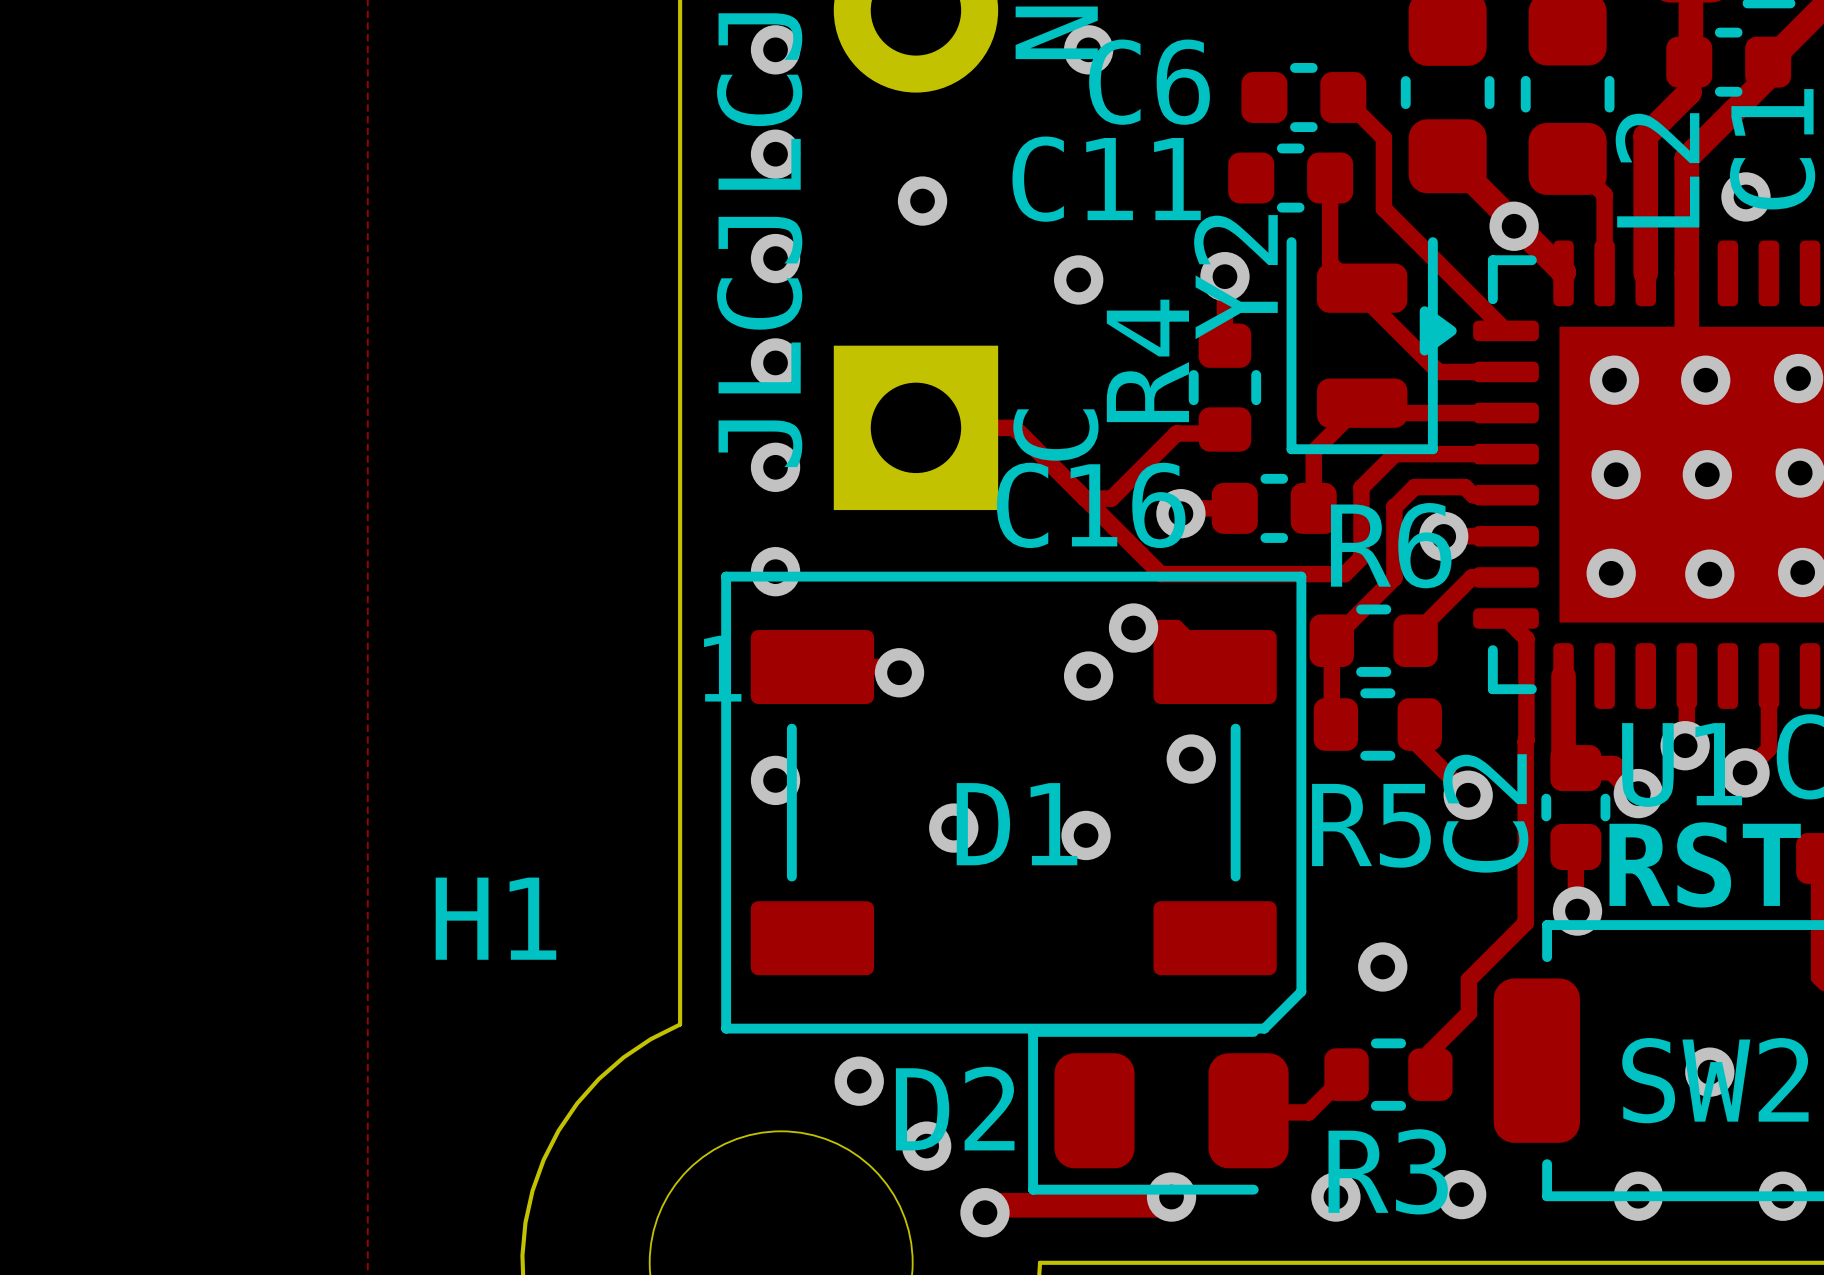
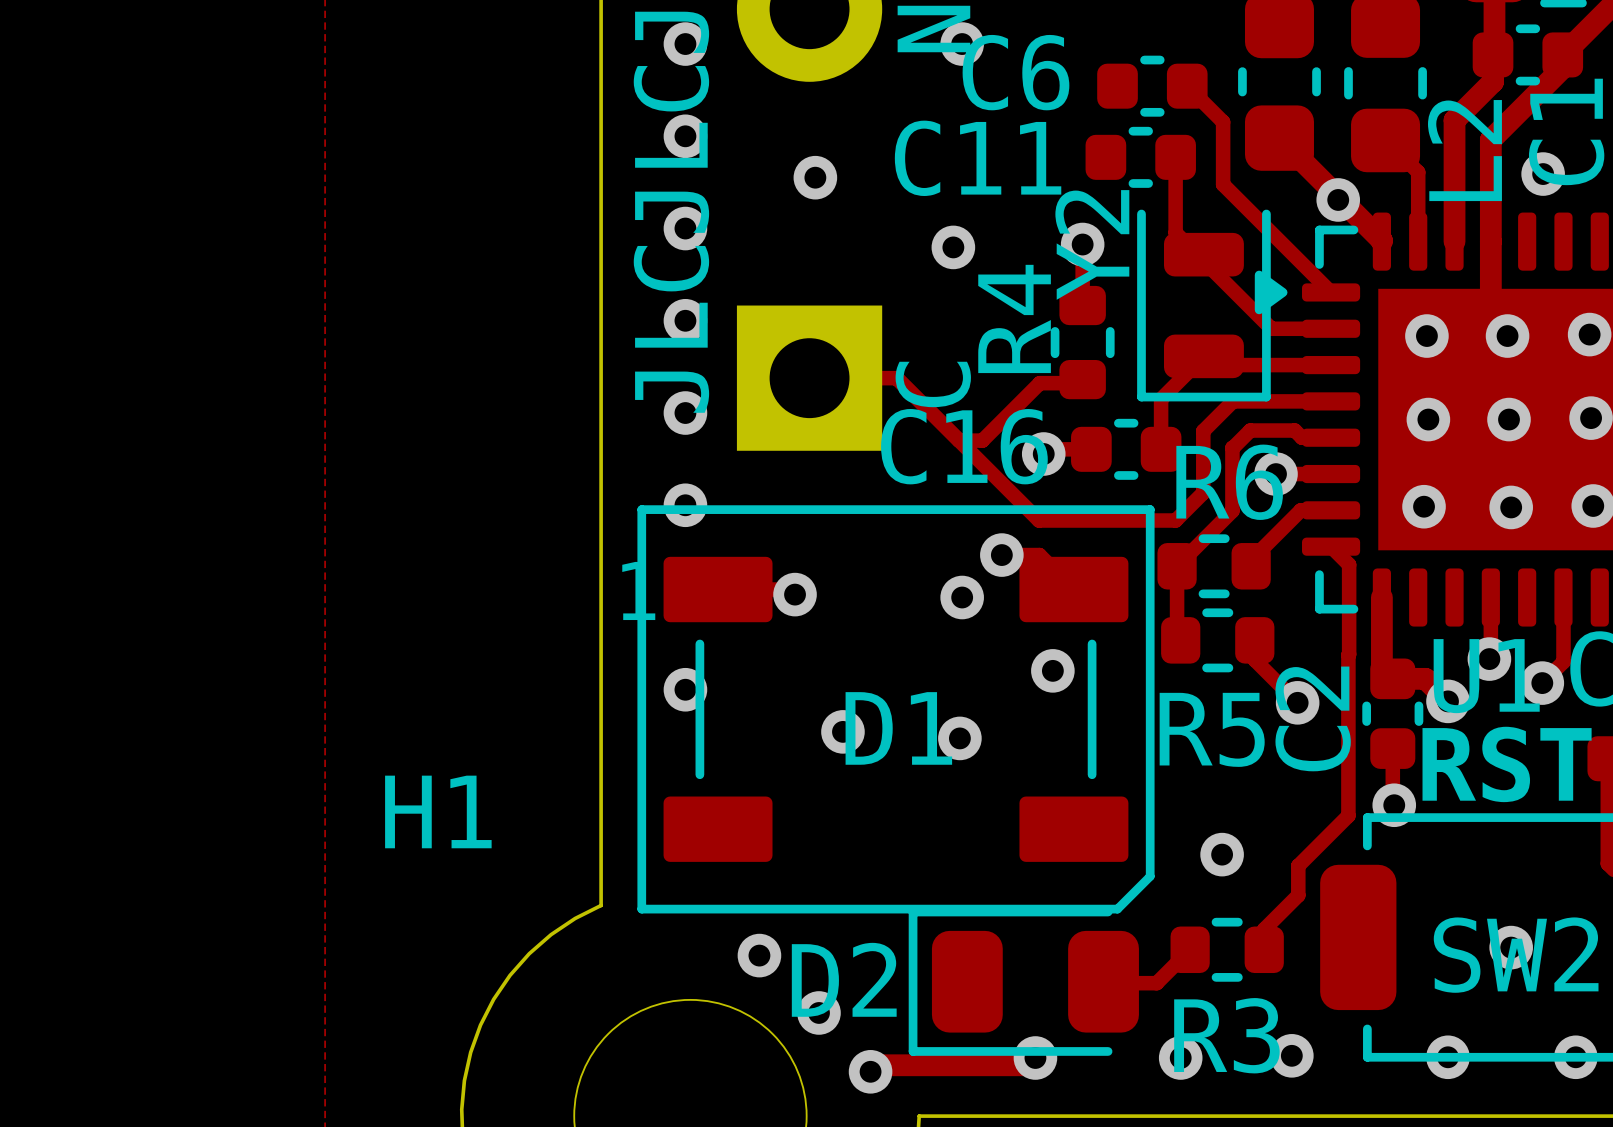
track: (1160, 574) (1344, 574) -> (1026, 507) (1039, 520) (1175, 520) (1188, 507)

